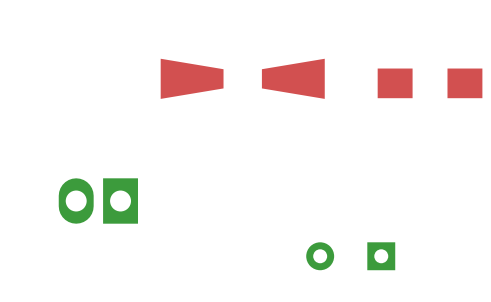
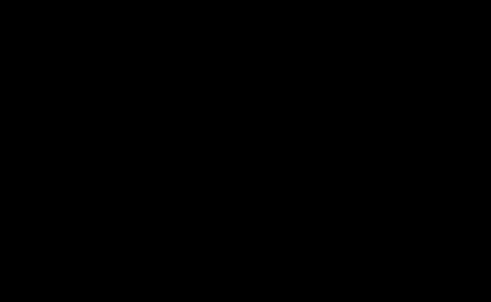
part: (242, 78) -> none
part: (430, 83) -> none
part: (98, 201) -> none
part: (350, 256) -> none

